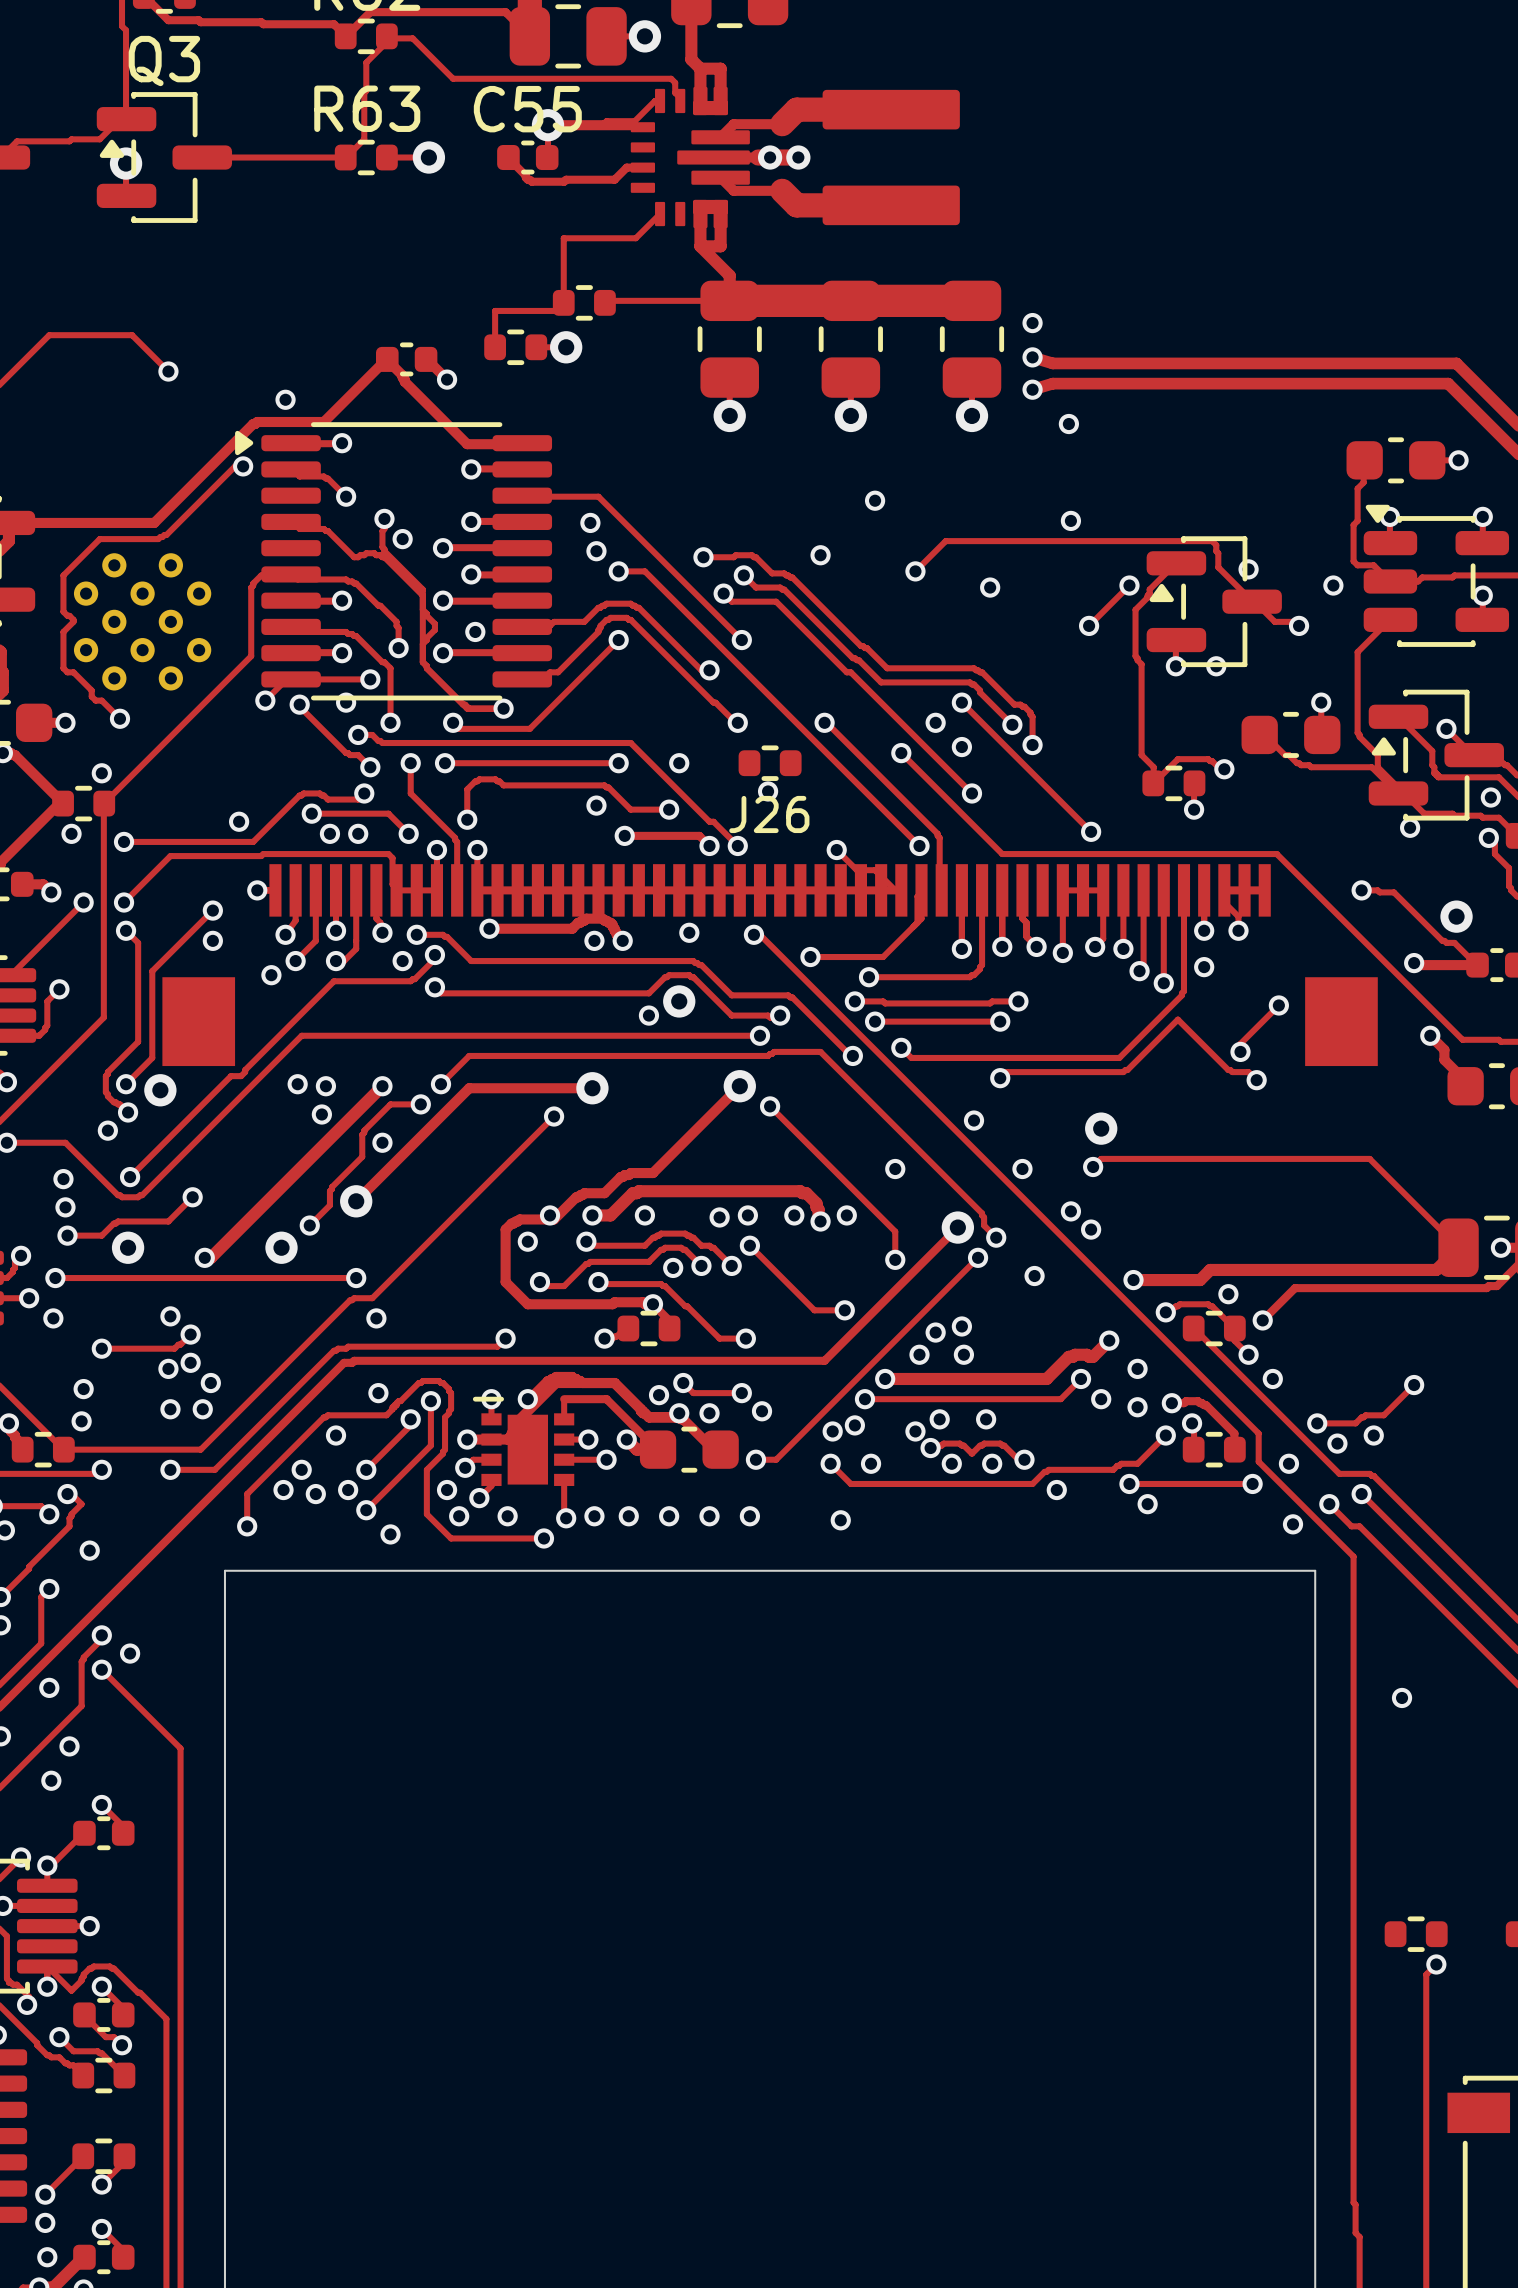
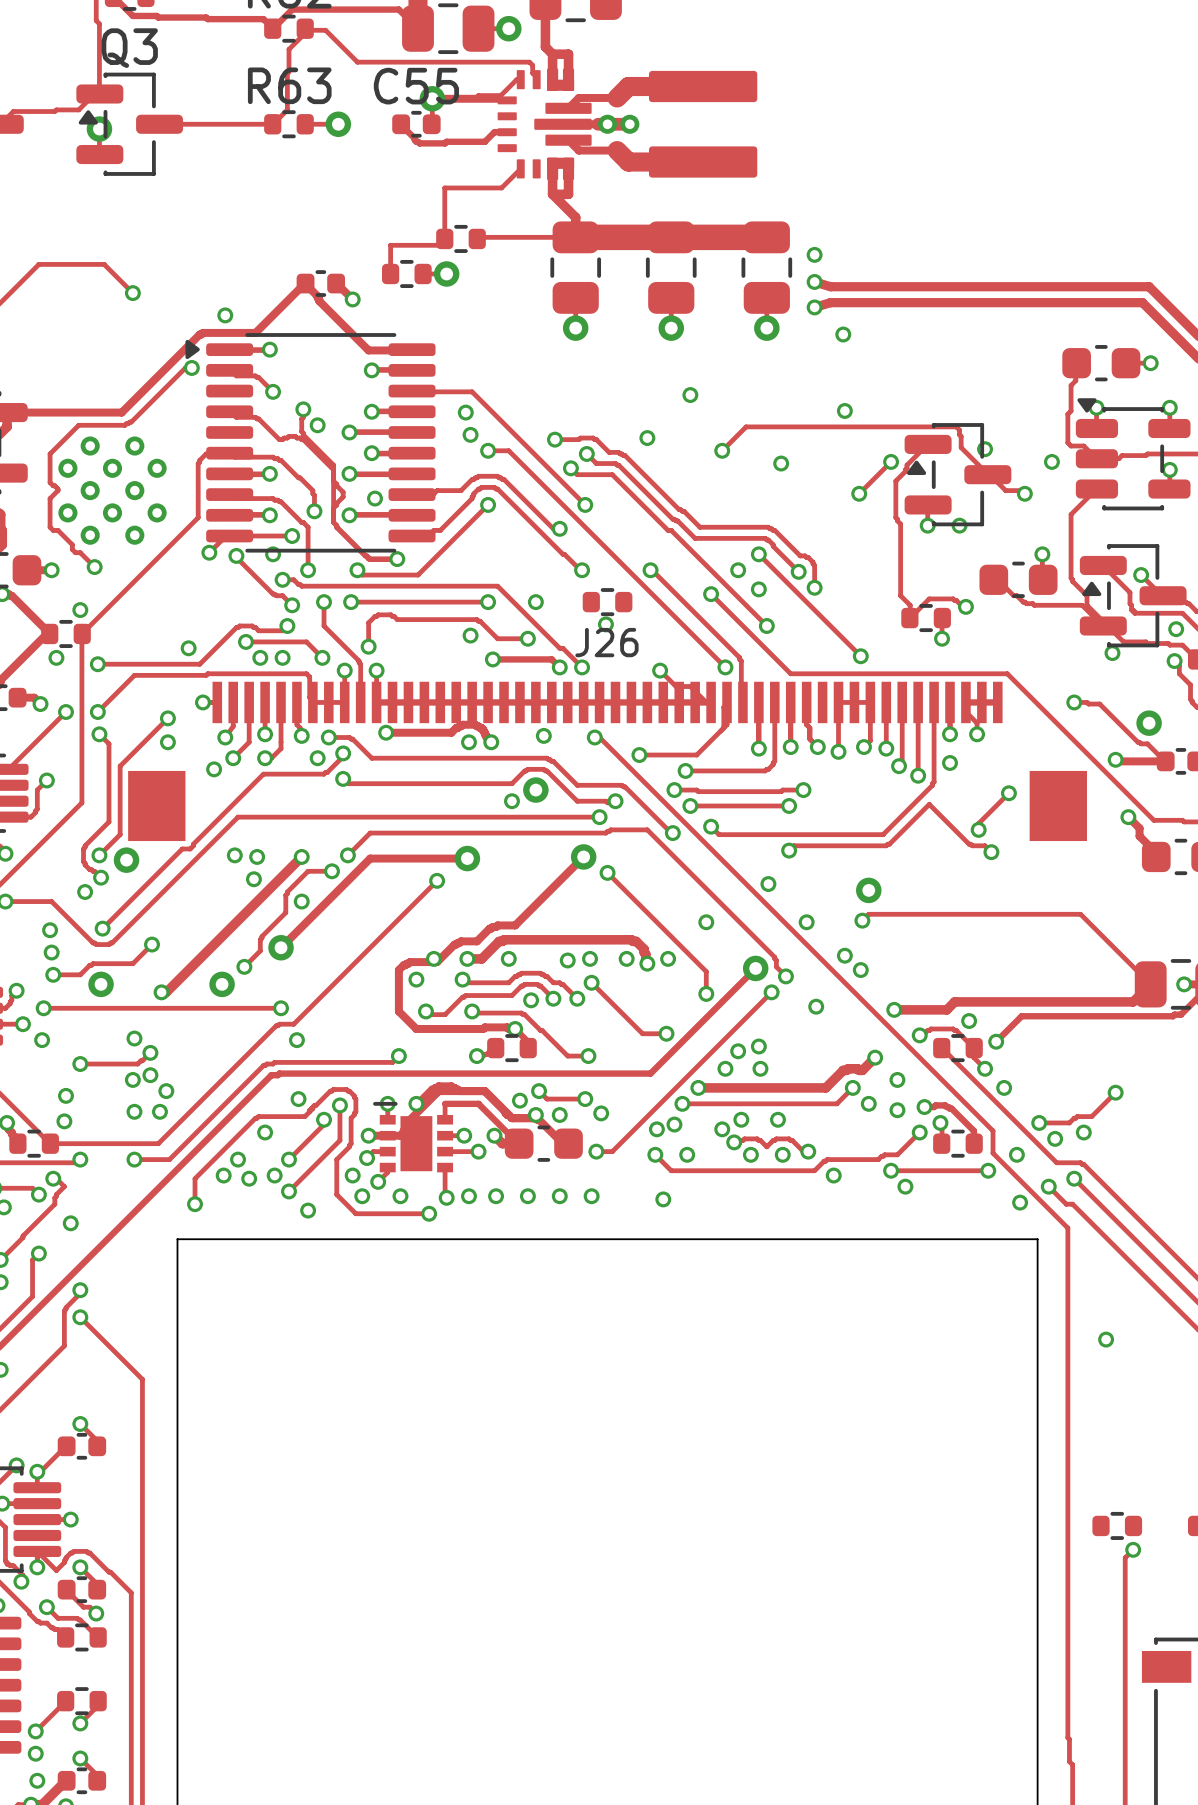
via: (130, 1653) -> none
via: (49, 1687) -> none
via: (69, 1746) -> none
via: (51, 1780) -> none

